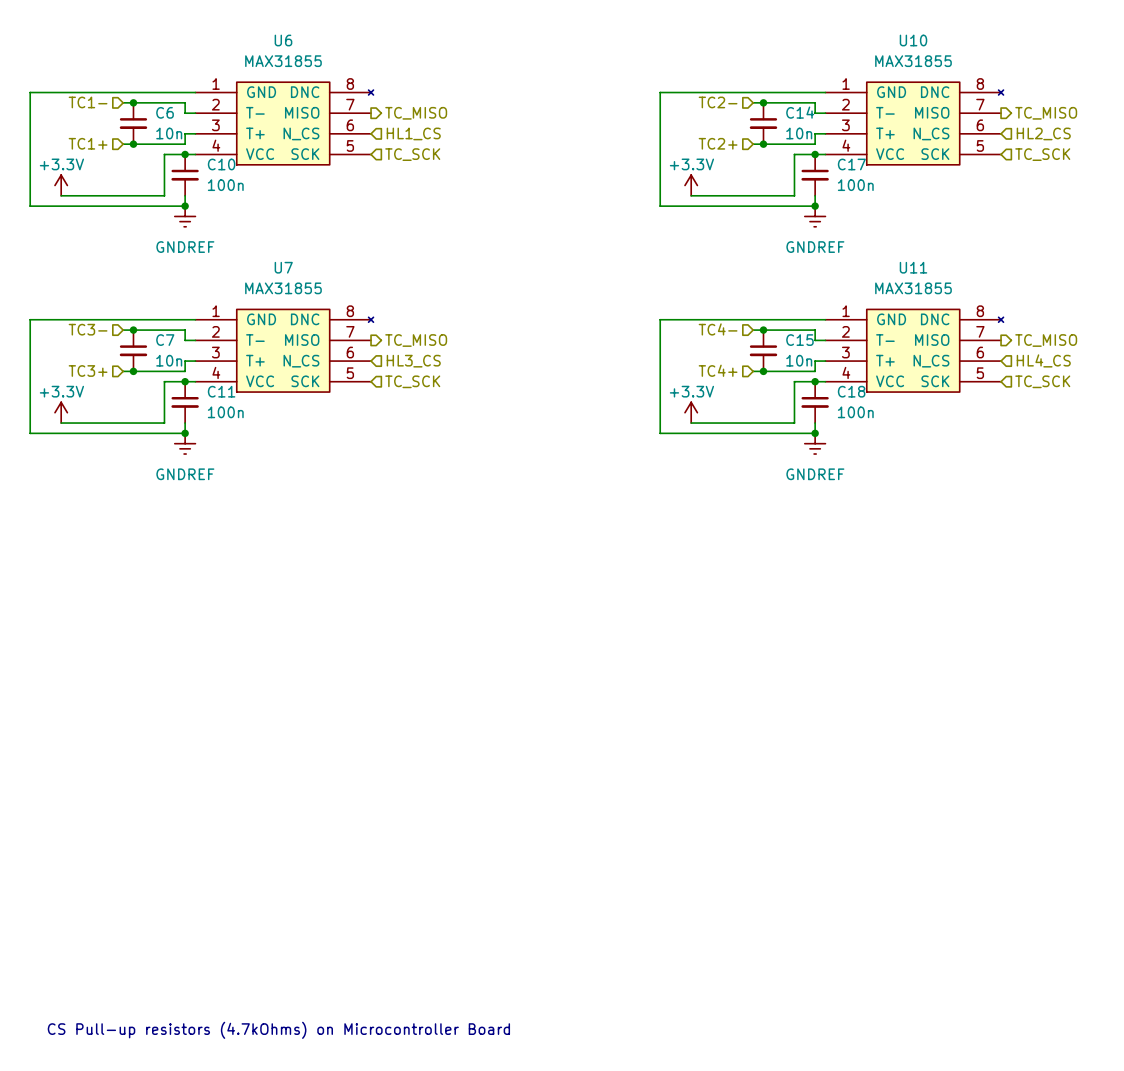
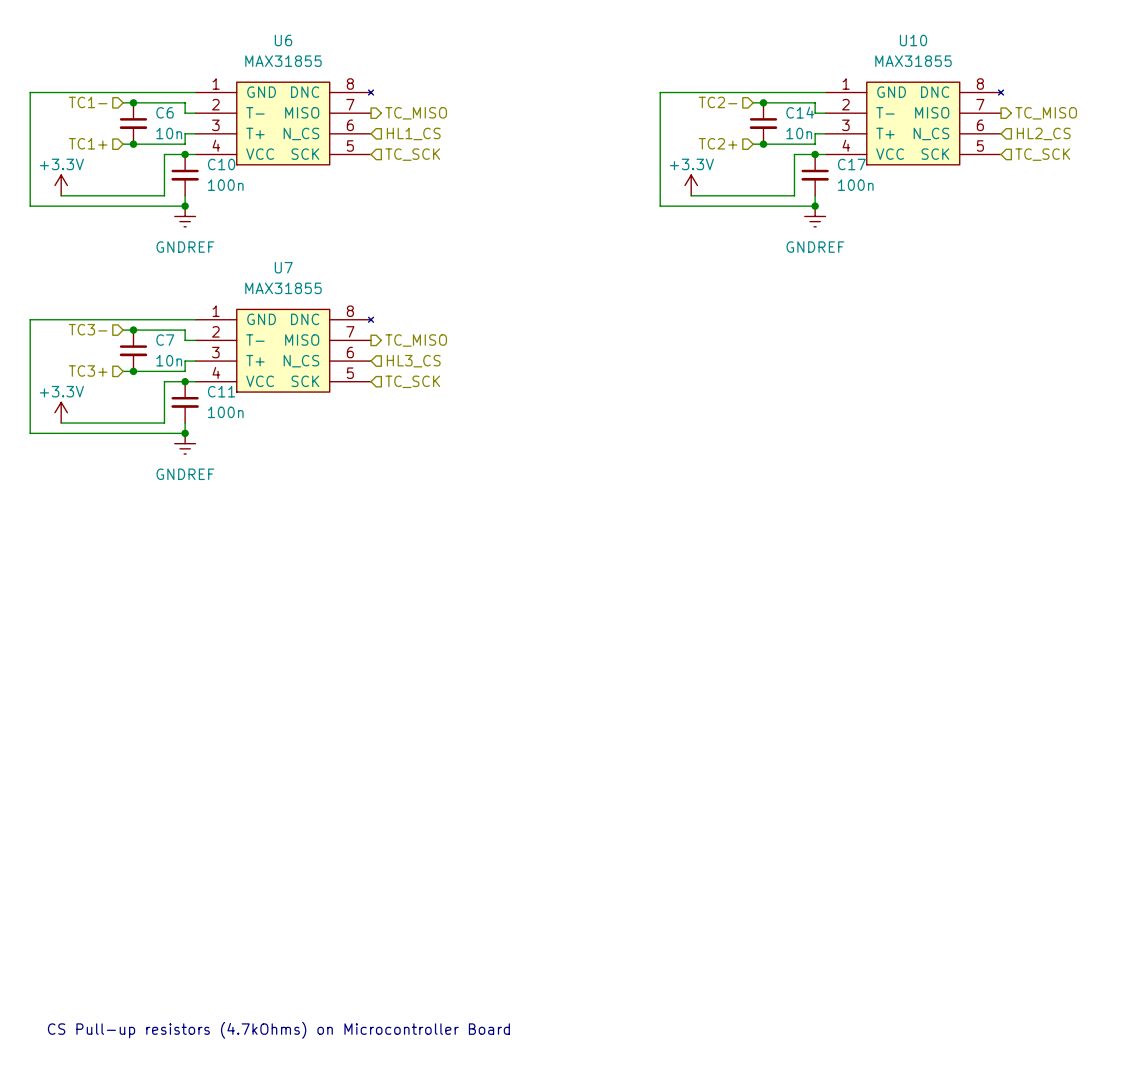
wire: (825, 319) (660, 319) (660, 433) (815, 433) (815, 423) -> none
hierarchical label: TC4- (718, 329) -> none
wire: (753, 330) (815, 330) (815, 340) (825, 340) -> none
junction: (763, 330) -> none
hierarchical label: TC_MISO (1046, 340) -> none
C15: 10n (763, 350) -> none
U11: MAX31855 (914, 350) -> none
hierarchical label: HL4_CS (1043, 360) -> none
wire: (825, 361) (815, 361) (815, 371) (753, 371) -> none
hierarchical label: TC4+ (718, 370) -> none
junction: (763, 371) -> none
junction: (815, 381) -> none
wire: (825, 381) (794, 381) (794, 423) (691, 423) -> none
hierarchical label: TC_SCK (1042, 381) -> none
C18: 100n (815, 402) -> none
power symbol: +3.3V (691, 412) -> none
junction: (815, 433) -> none
power symbol: GNDREF (815, 443) -> none

